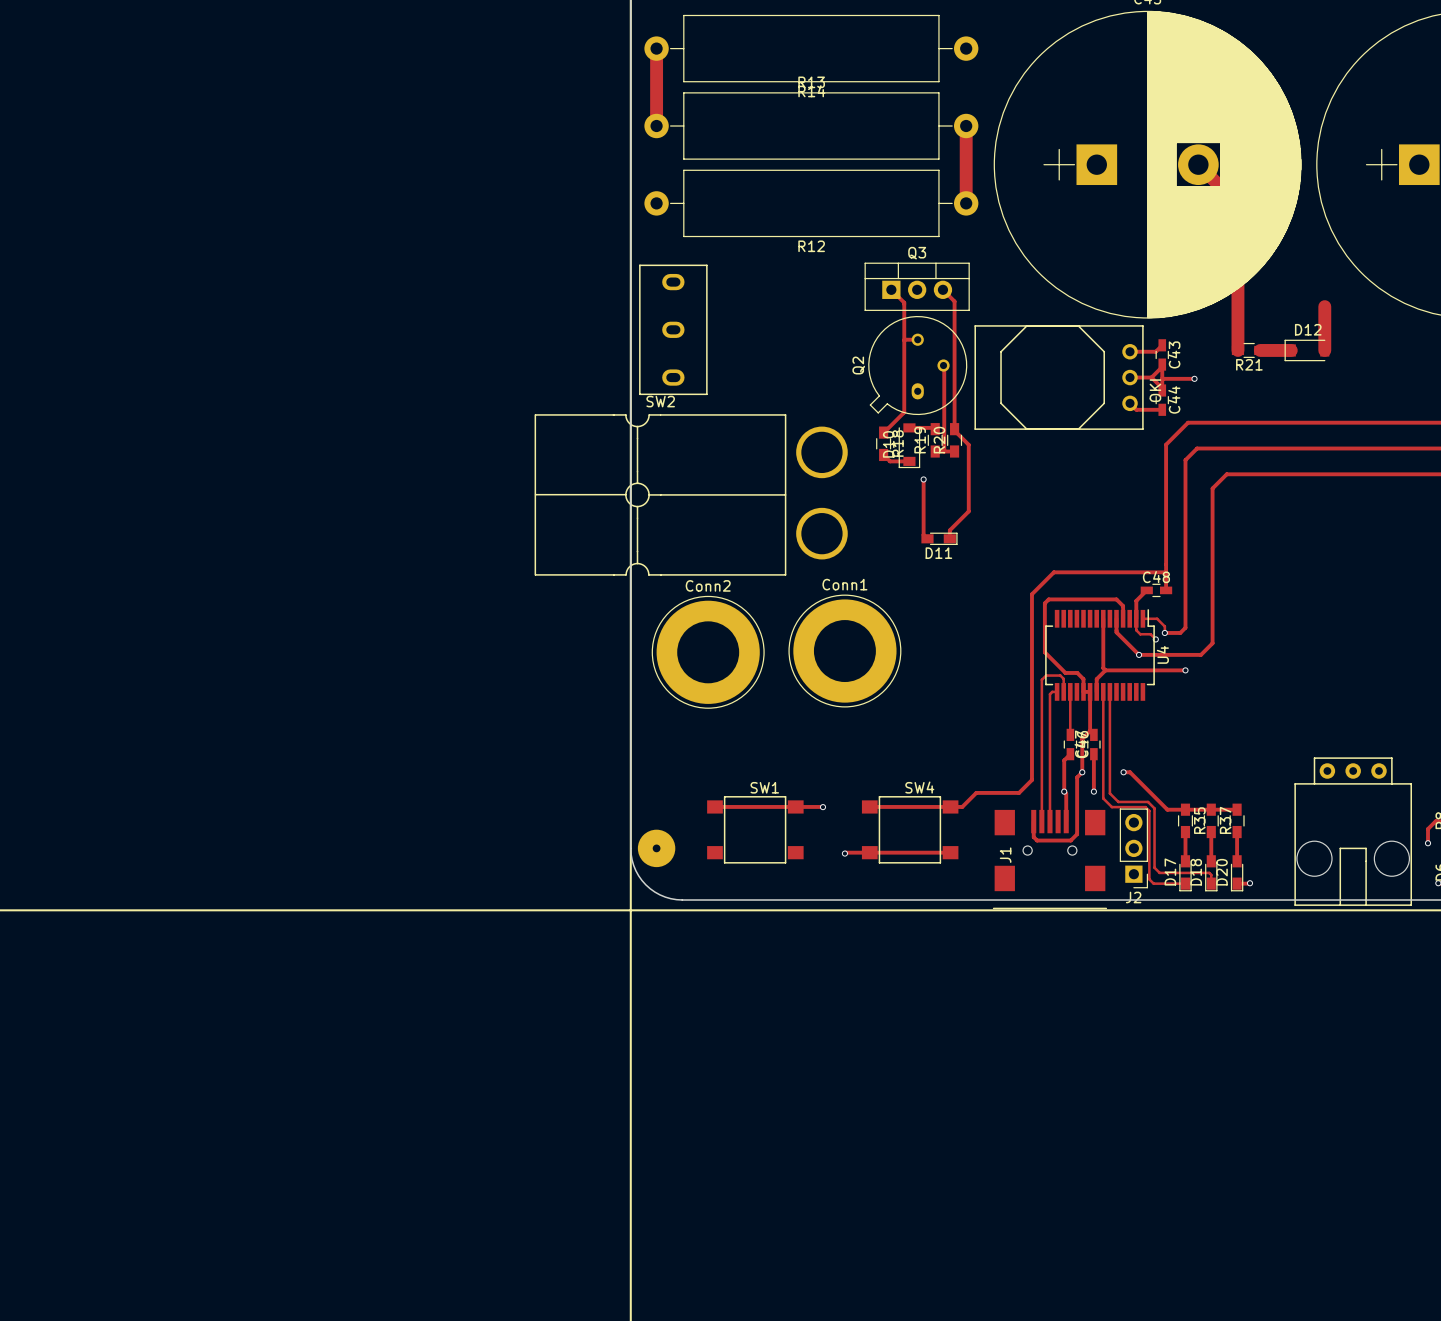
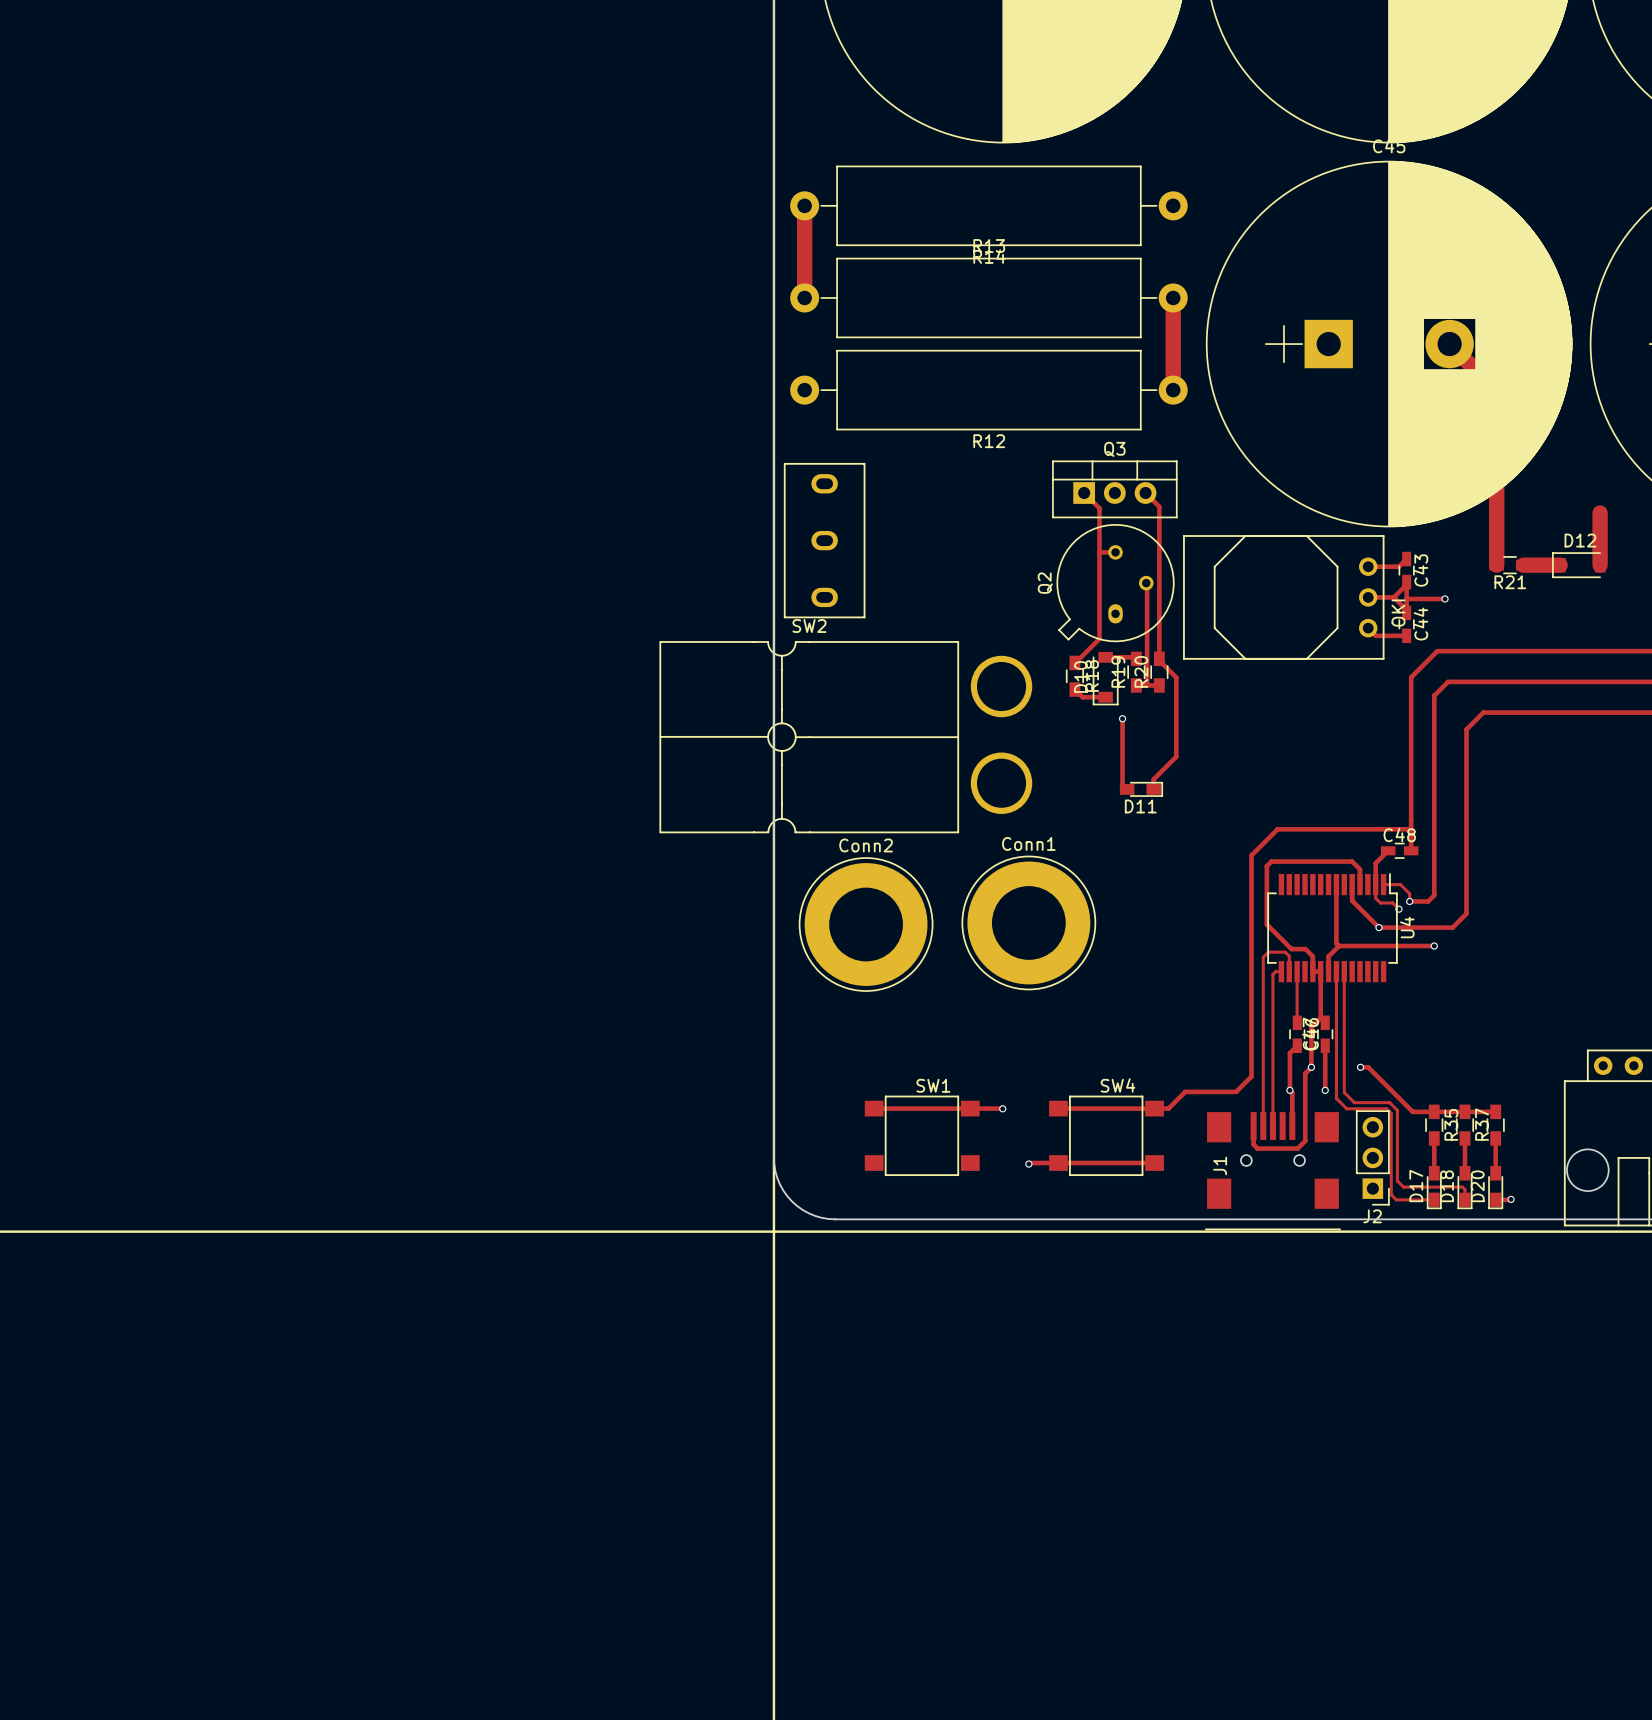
part: (656, 848) -> none

